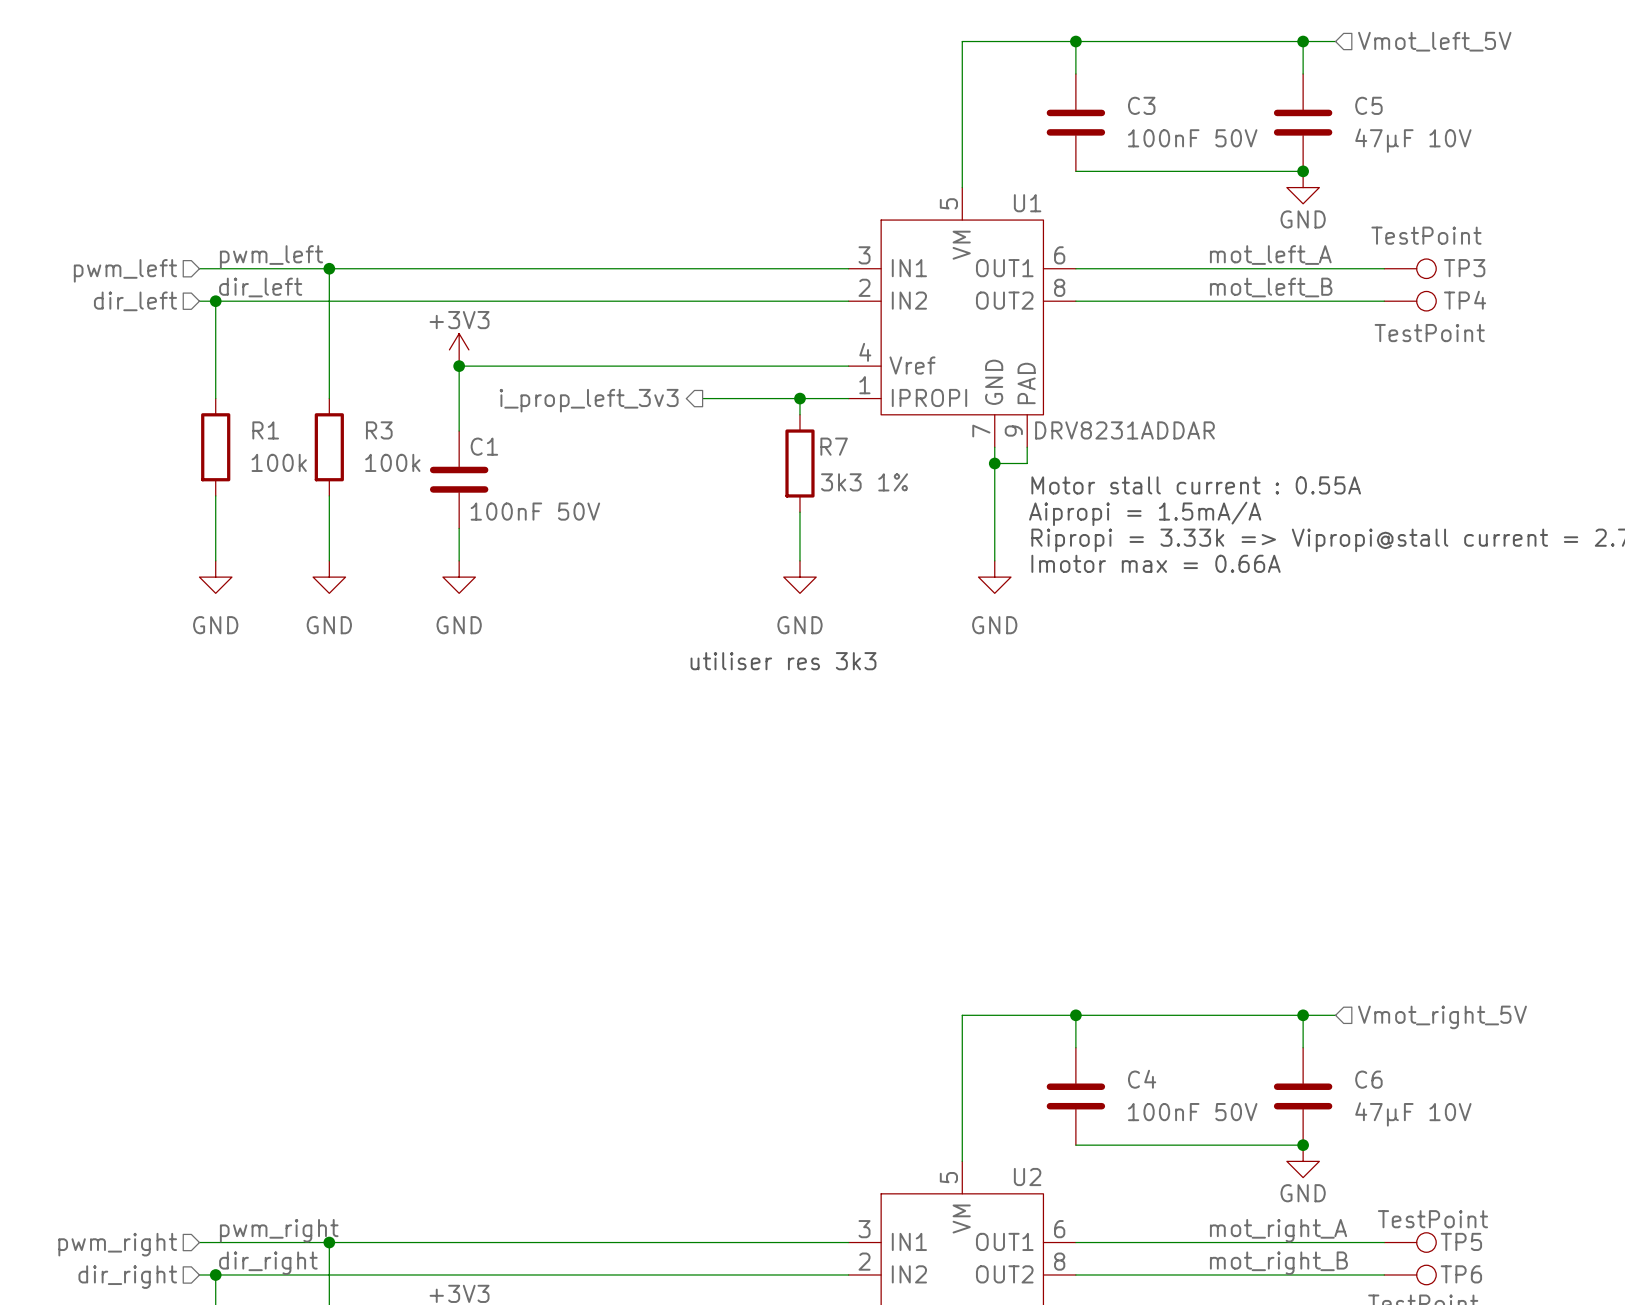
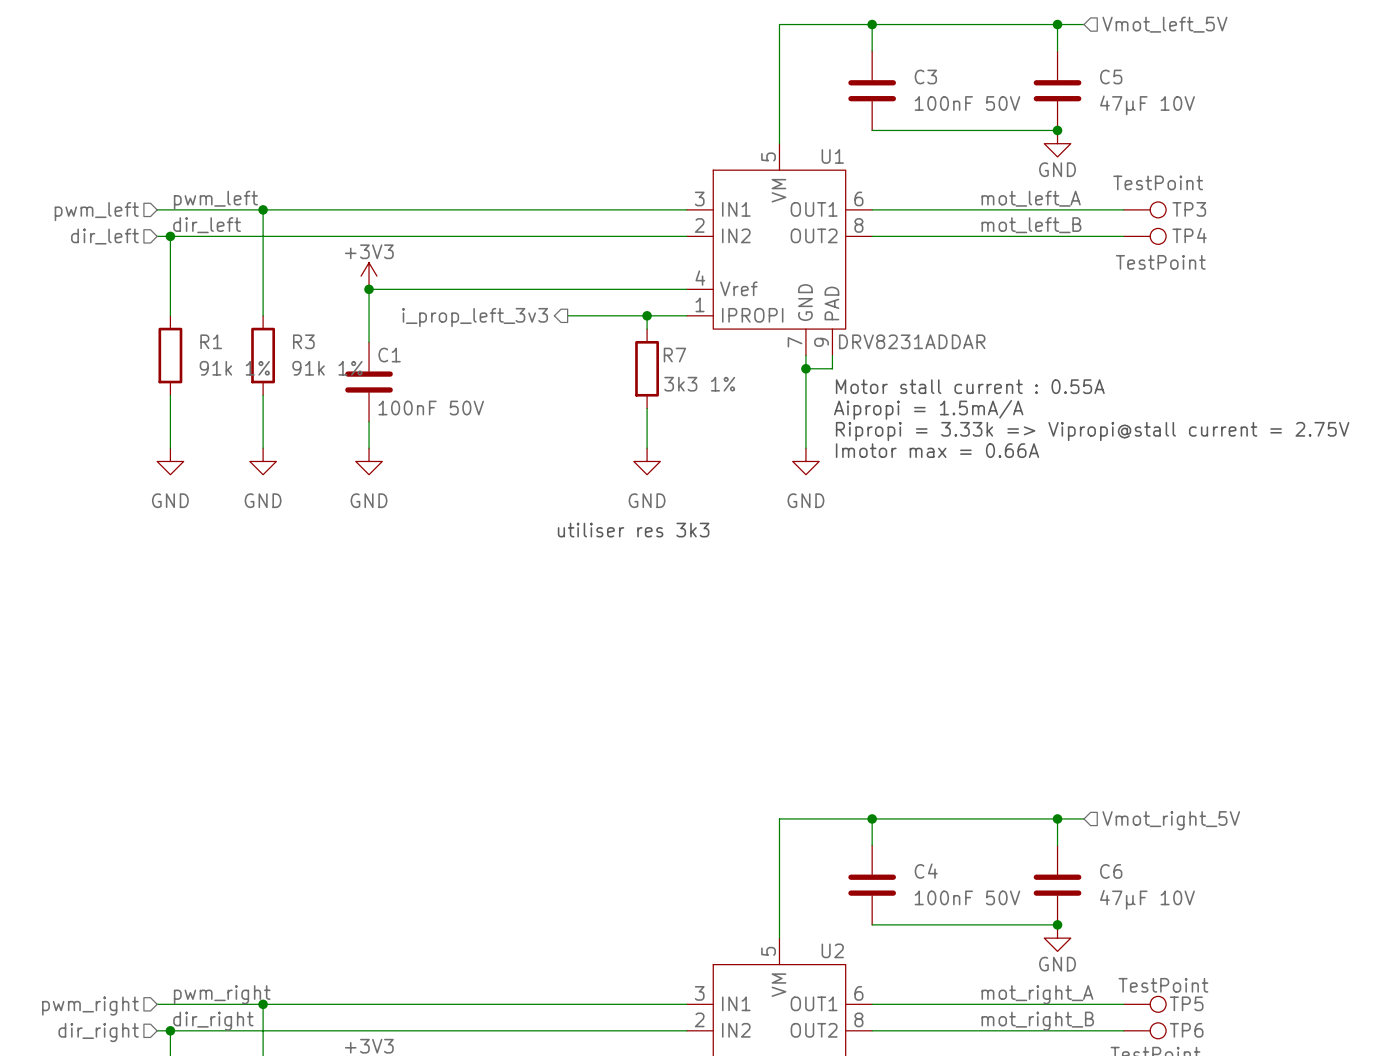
R1 value: 100k (279, 462) -> 91k 1% (234, 368)
R3 value: 100k (392, 462) -> 91k 1% (327, 368)

